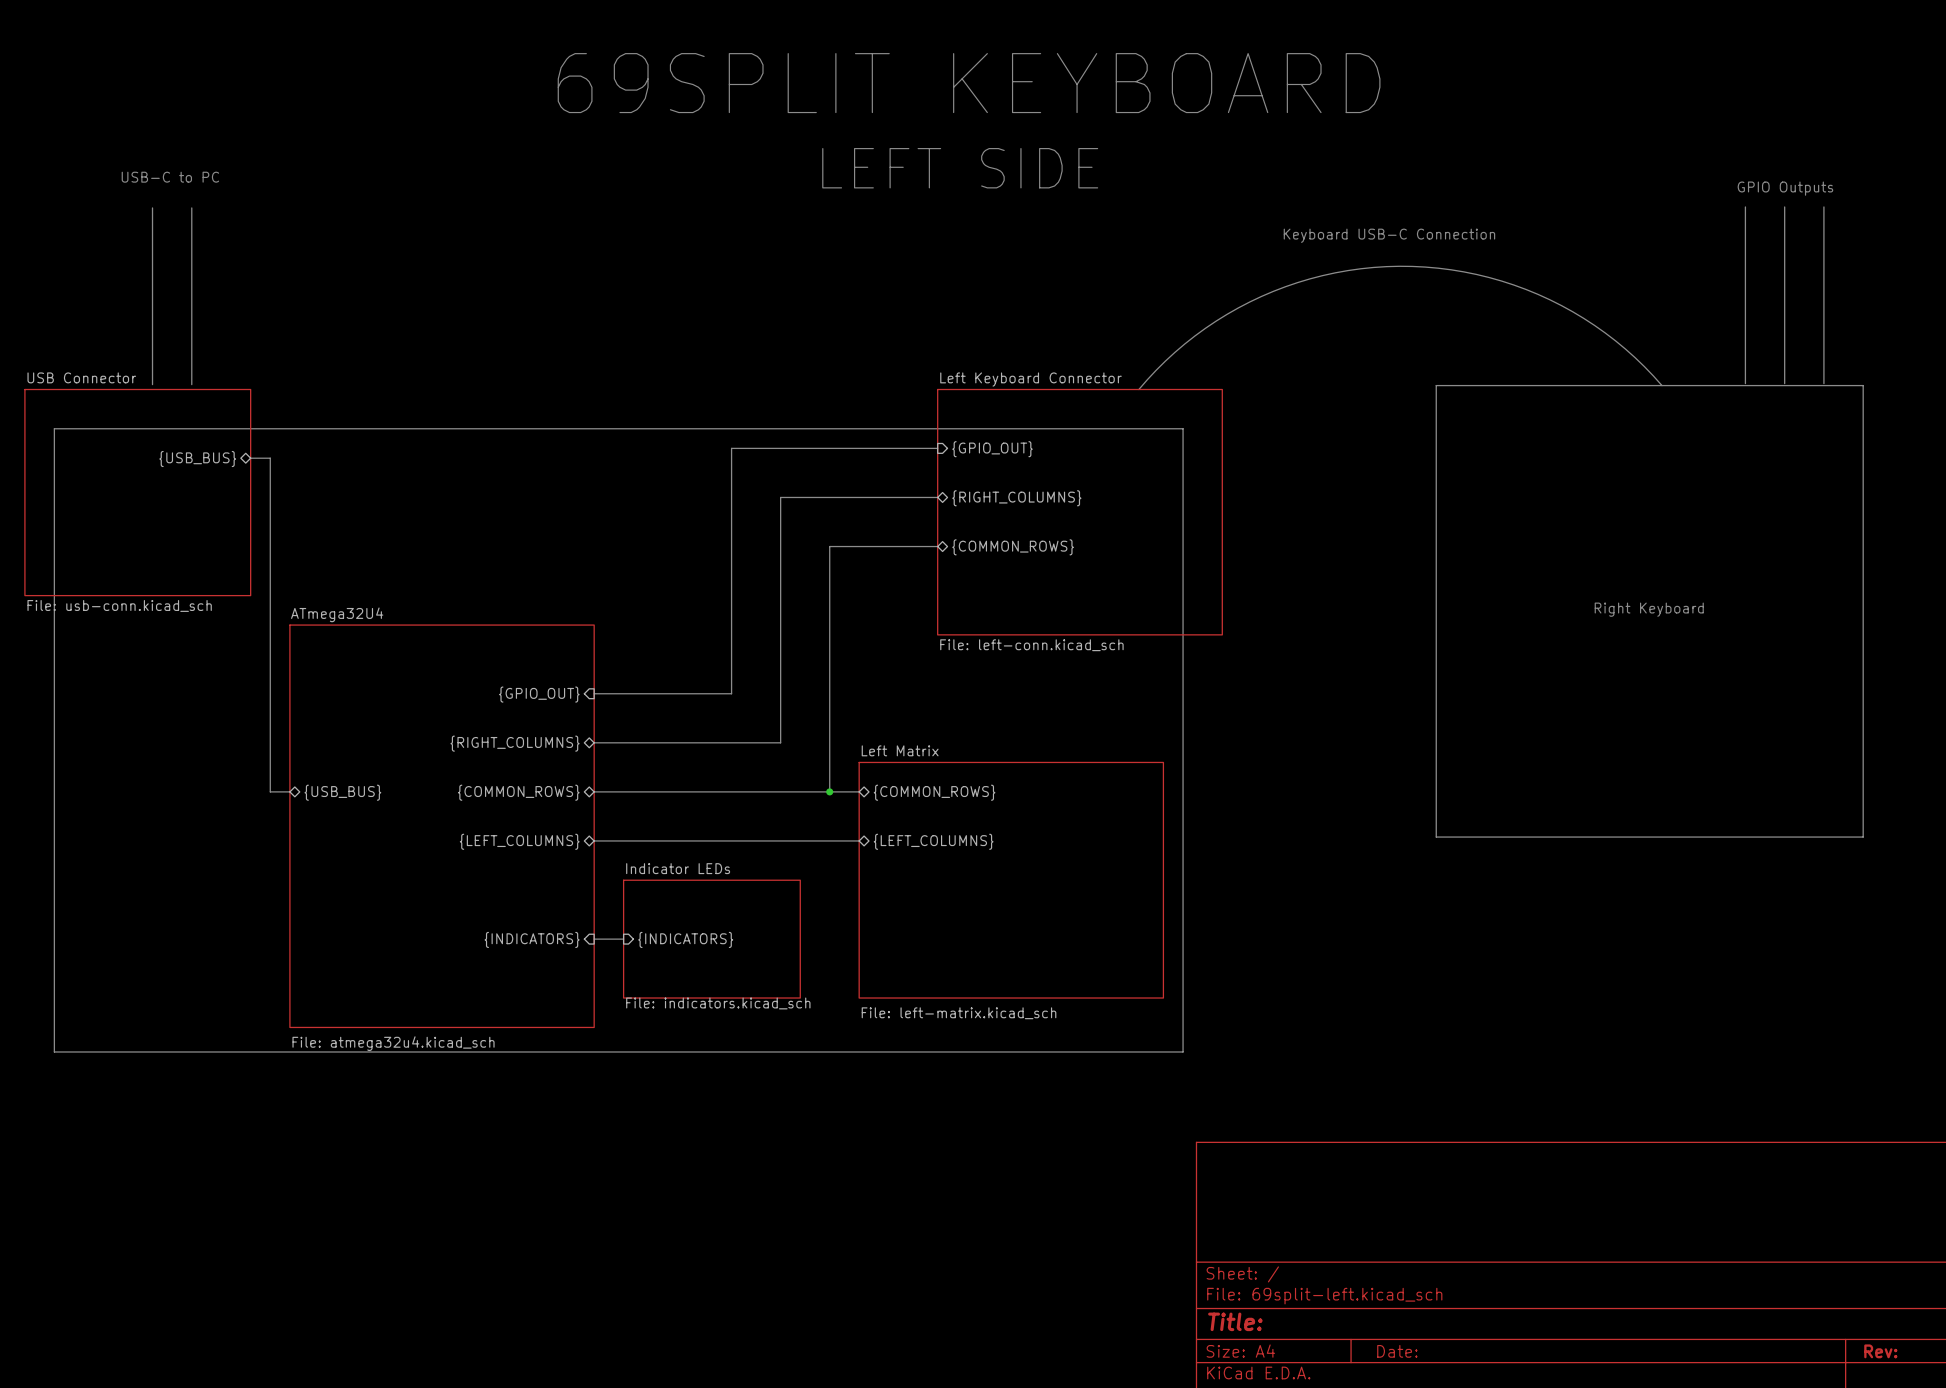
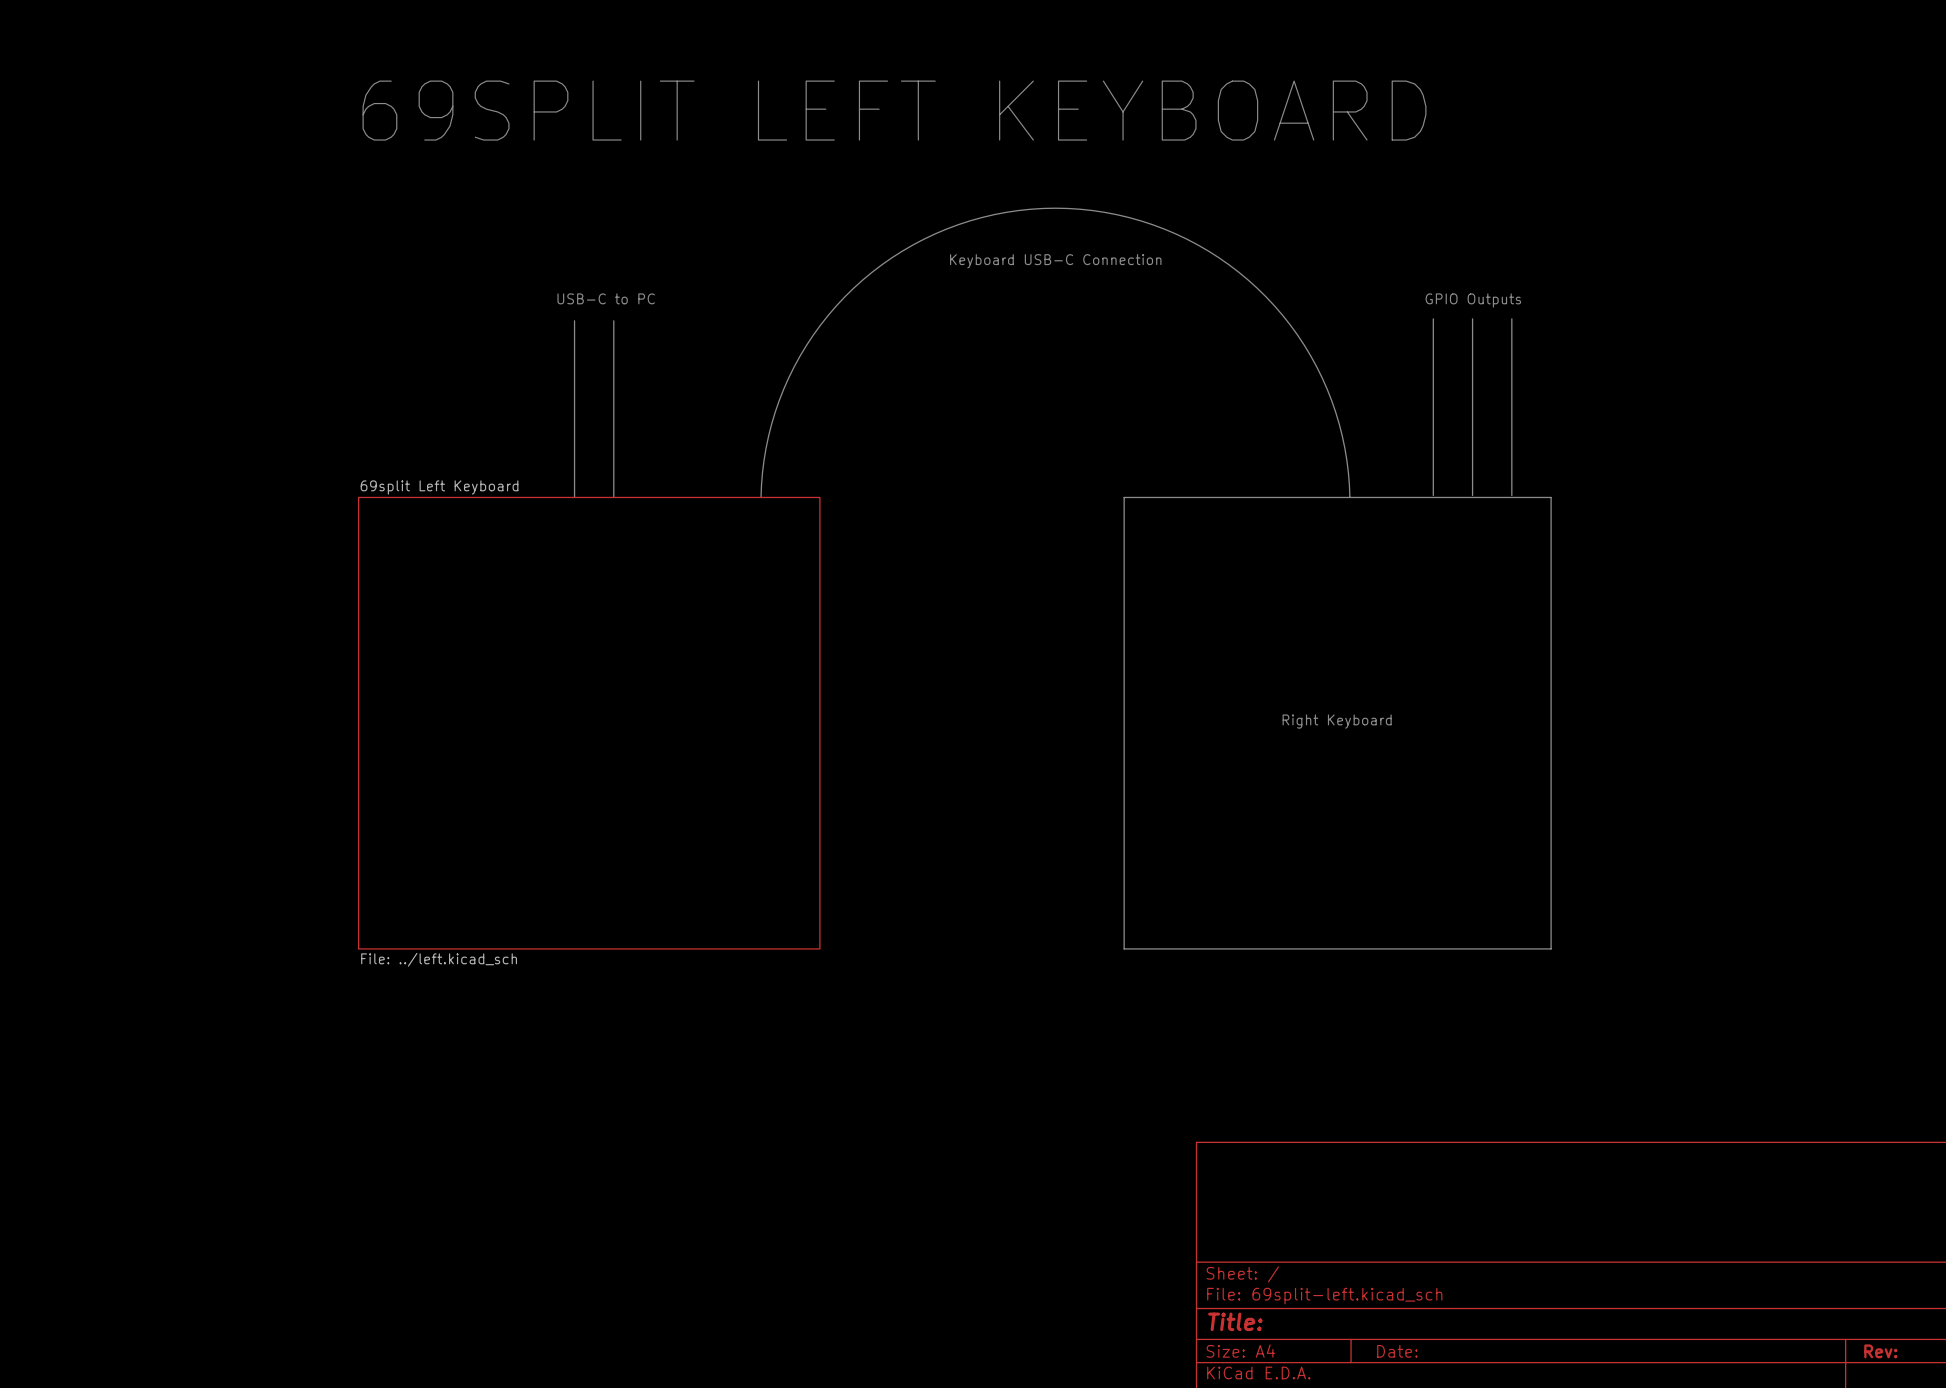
text: 69SPLIT KEYBOARD (969, 83) -> 69SPLIT LEFT KEYBOARD (894, 110)
text: LEFT SIDE (960, 168) -> none
text: USB-C to PC (170, 177) -> none
text: GPIO Outputs (1785, 188) -> none
line: (1745, 206) (1745, 383) -> none
line: (1784, 206) (1784, 383) -> none
line: (1823, 206) (1823, 383) -> none
line: (152, 207) (152, 384) -> none
line: (191, 207) (191, 384) -> none
text: Keyboard USB-C Connection (1389, 235) -> none
text: none -> Keyboard USB-C Connection (1055, 261)
text: none -> USB-C to PC (606, 298)
text: none -> GPIO Outputs (1473, 300)
line: none -> (1433, 318) (1433, 495)
line: none -> (1472, 318) (1472, 495)
line: none -> (1511, 318) (1511, 495)
line: none -> (574, 320) (574, 497)
line: none -> (613, 320) (613, 497)
line: (1436, 385) (1863, 385) (1863, 837) (1436, 837) (1436, 385) -> none
line: (1661, 385) (1635, 357) (1605, 332) (1572, 311) (1538, 294) (1476, 274) (1438, 268) (1399, 266) (1360, 268) (1322, 275) (1285, 286) (1249, 301) (1216, 321) (1184, 344) (1138, 389) -> none
line: (54, 428) (1183, 428) (1183, 1051) (54, 1051) (54, 428) -> none
bus: (937, 448) (731, 448) (731, 693) (594, 693) -> none
sheet pin: {GPIO_OUT} (992, 449) -> none
bus: (250, 458) (270, 458) (270, 791) (289, 791) -> none
sheet pin: {USB_BUS} (197, 459) -> none
sheet USB Connector: File: usb-conn.kicad_sch (137, 492) -> none
line: none -> (761, 497) (764, 460) (768, 436) (783, 389) (794, 366) (813, 335) (828, 315) (853, 288) (892, 257) (924, 239) (946, 228) (982, 217) (1006, 212) (1055, 208) (1104, 212) (1140, 220) (1164, 228) (1197, 244) (1218, 257) (1257, 288) (1282, 315) (1297, 335) (1316, 366) (1327, 389) (1342, 436) (1348, 472) (1349, 497)
bus: (937, 497) (780, 497) (780, 742) (594, 742) -> none
line: none -> (1124, 497) (1551, 497) (1551, 948) (1124, 948) (1124, 497)
sheet pin: {RIGHT_COLUMNS} (1016, 498) -> none
sheet Left Keyboard Connector: File: left-conn.kicad_sch (1079, 512) -> none
bus: (937, 546) (829, 546) (829, 791) -> none
sheet pin: {COMMON_ROWS} (1013, 547) -> none
text: Right Keyboard (1649, 609) -> none
sheet pin: {GPIO_OUT} (539, 694) -> none
text: none -> Right Keyboard (1337, 721)
sheet 69split Left Keyboard: none -> File: ../left.kicad_sch (589, 723)
sheet pin: {RIGHT_COLUMNS} (515, 743) -> none
bus: (594, 791) (859, 791) -> none
junction: (829, 791) -> none
sheet pin: {USB_BUS} (342, 792) -> none
sheet pin: {COMMON_ROWS} (518, 792) -> none
sheet pin: {COMMON_ROWS} (934, 792) -> none
sheet ATmega32U4: File: atmega32u4.kicad_sch (442, 826) -> none
bus: (594, 840) (859, 840) -> none
sheet pin: {LEFT_COLUMNS} (519, 841) -> none
sheet pin: {LEFT_COLUMNS} (933, 841) -> none
sheet Left Matrix: File: left-matrix.kicad_sch (1011, 880) -> none
sheet pin: {INDICATORS} (532, 939) -> none
bus: (594, 939) (623, 939) -> none
sheet pin: {INDICATORS} (685, 939) -> none
sheet Indicator LEDs: File: indicators.kicad_sch (711, 939) -> none

